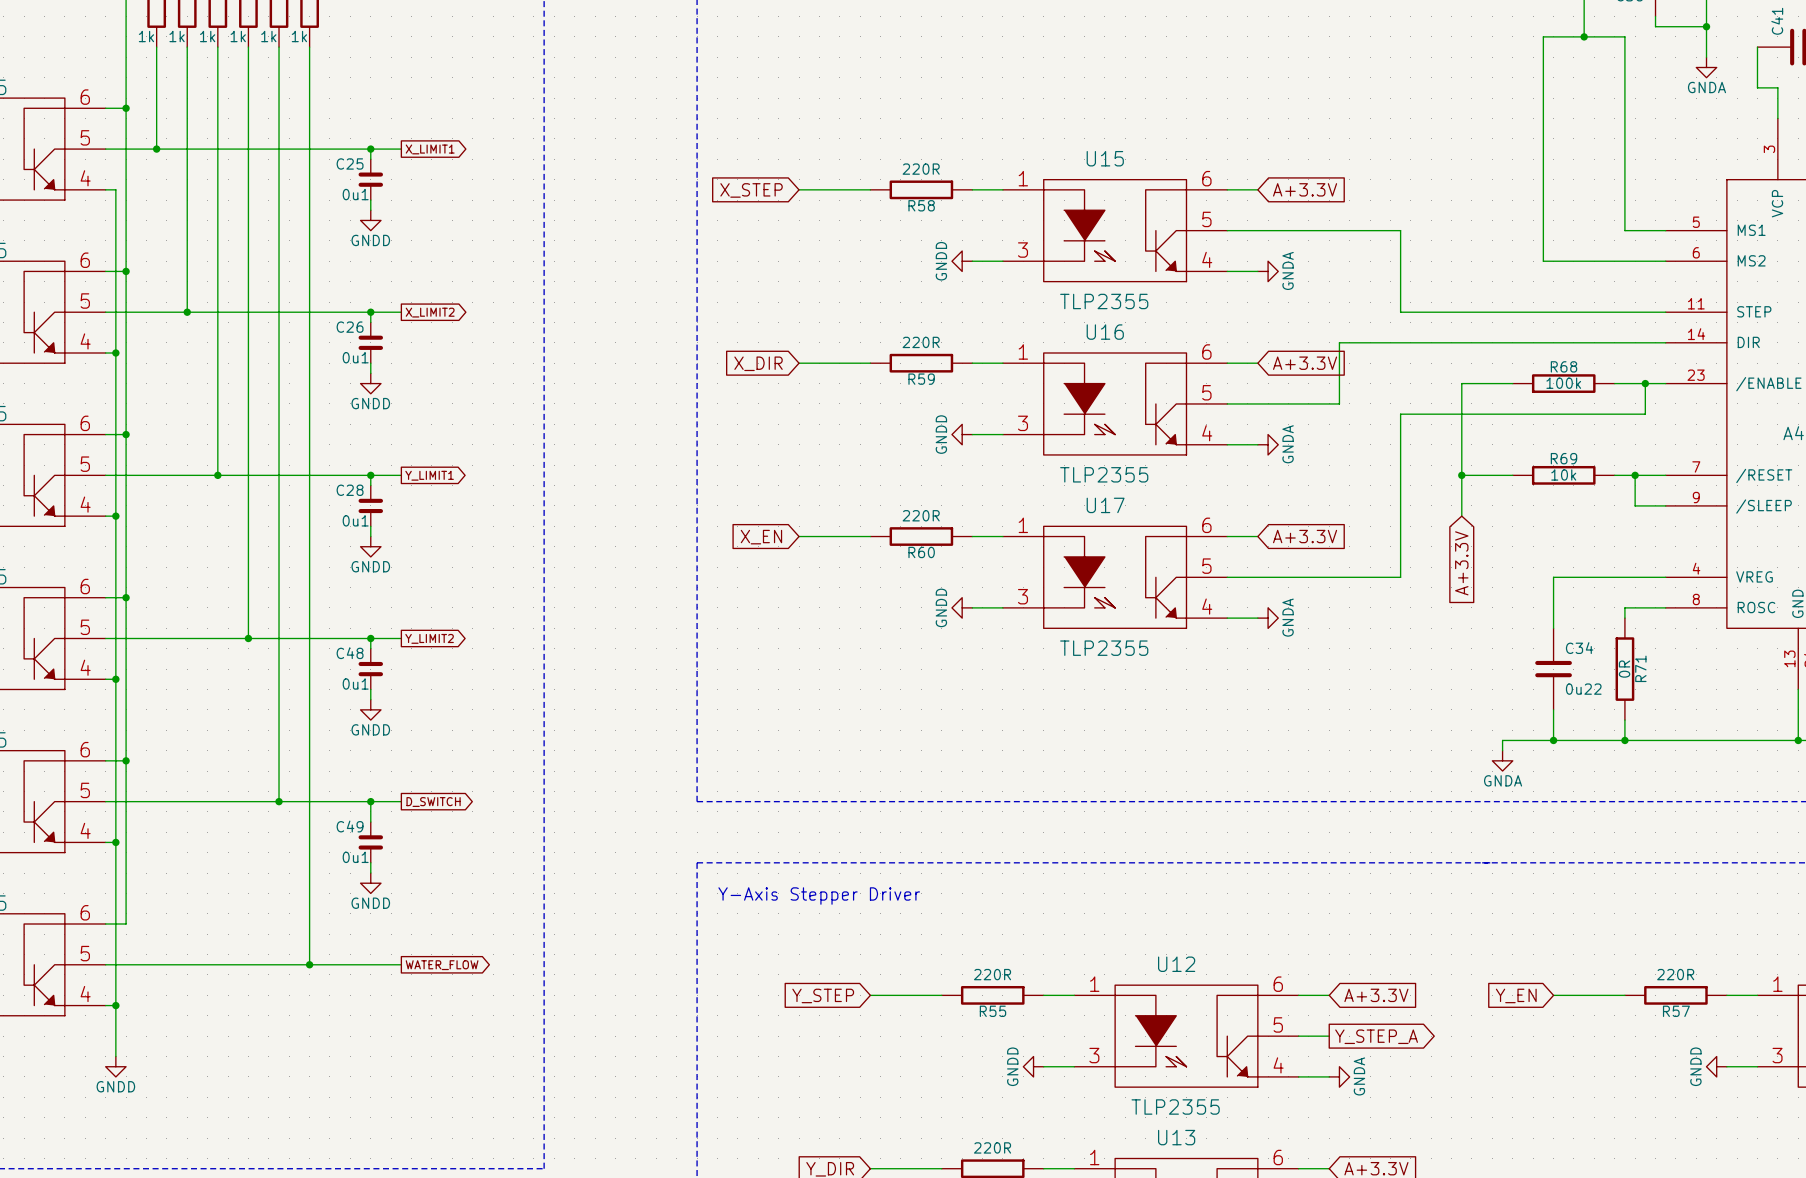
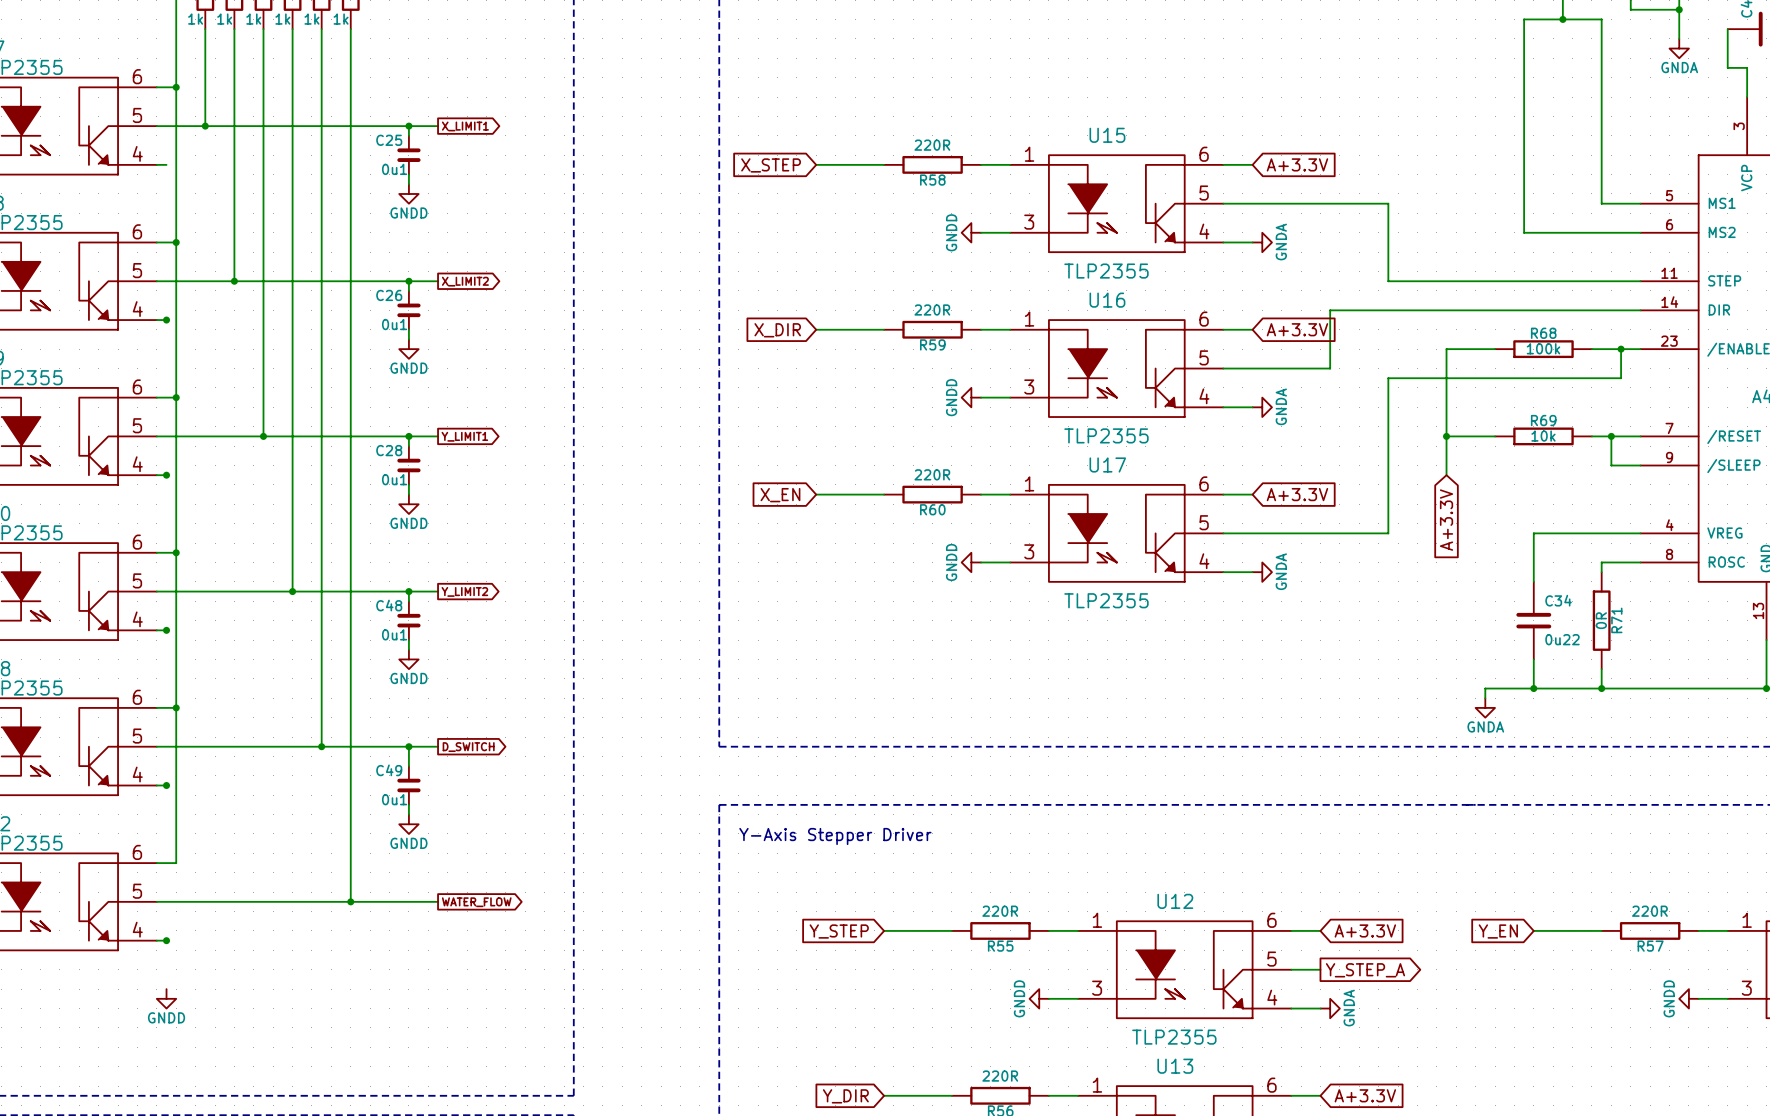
wire: (115, 189) (115, 1056) -> none

